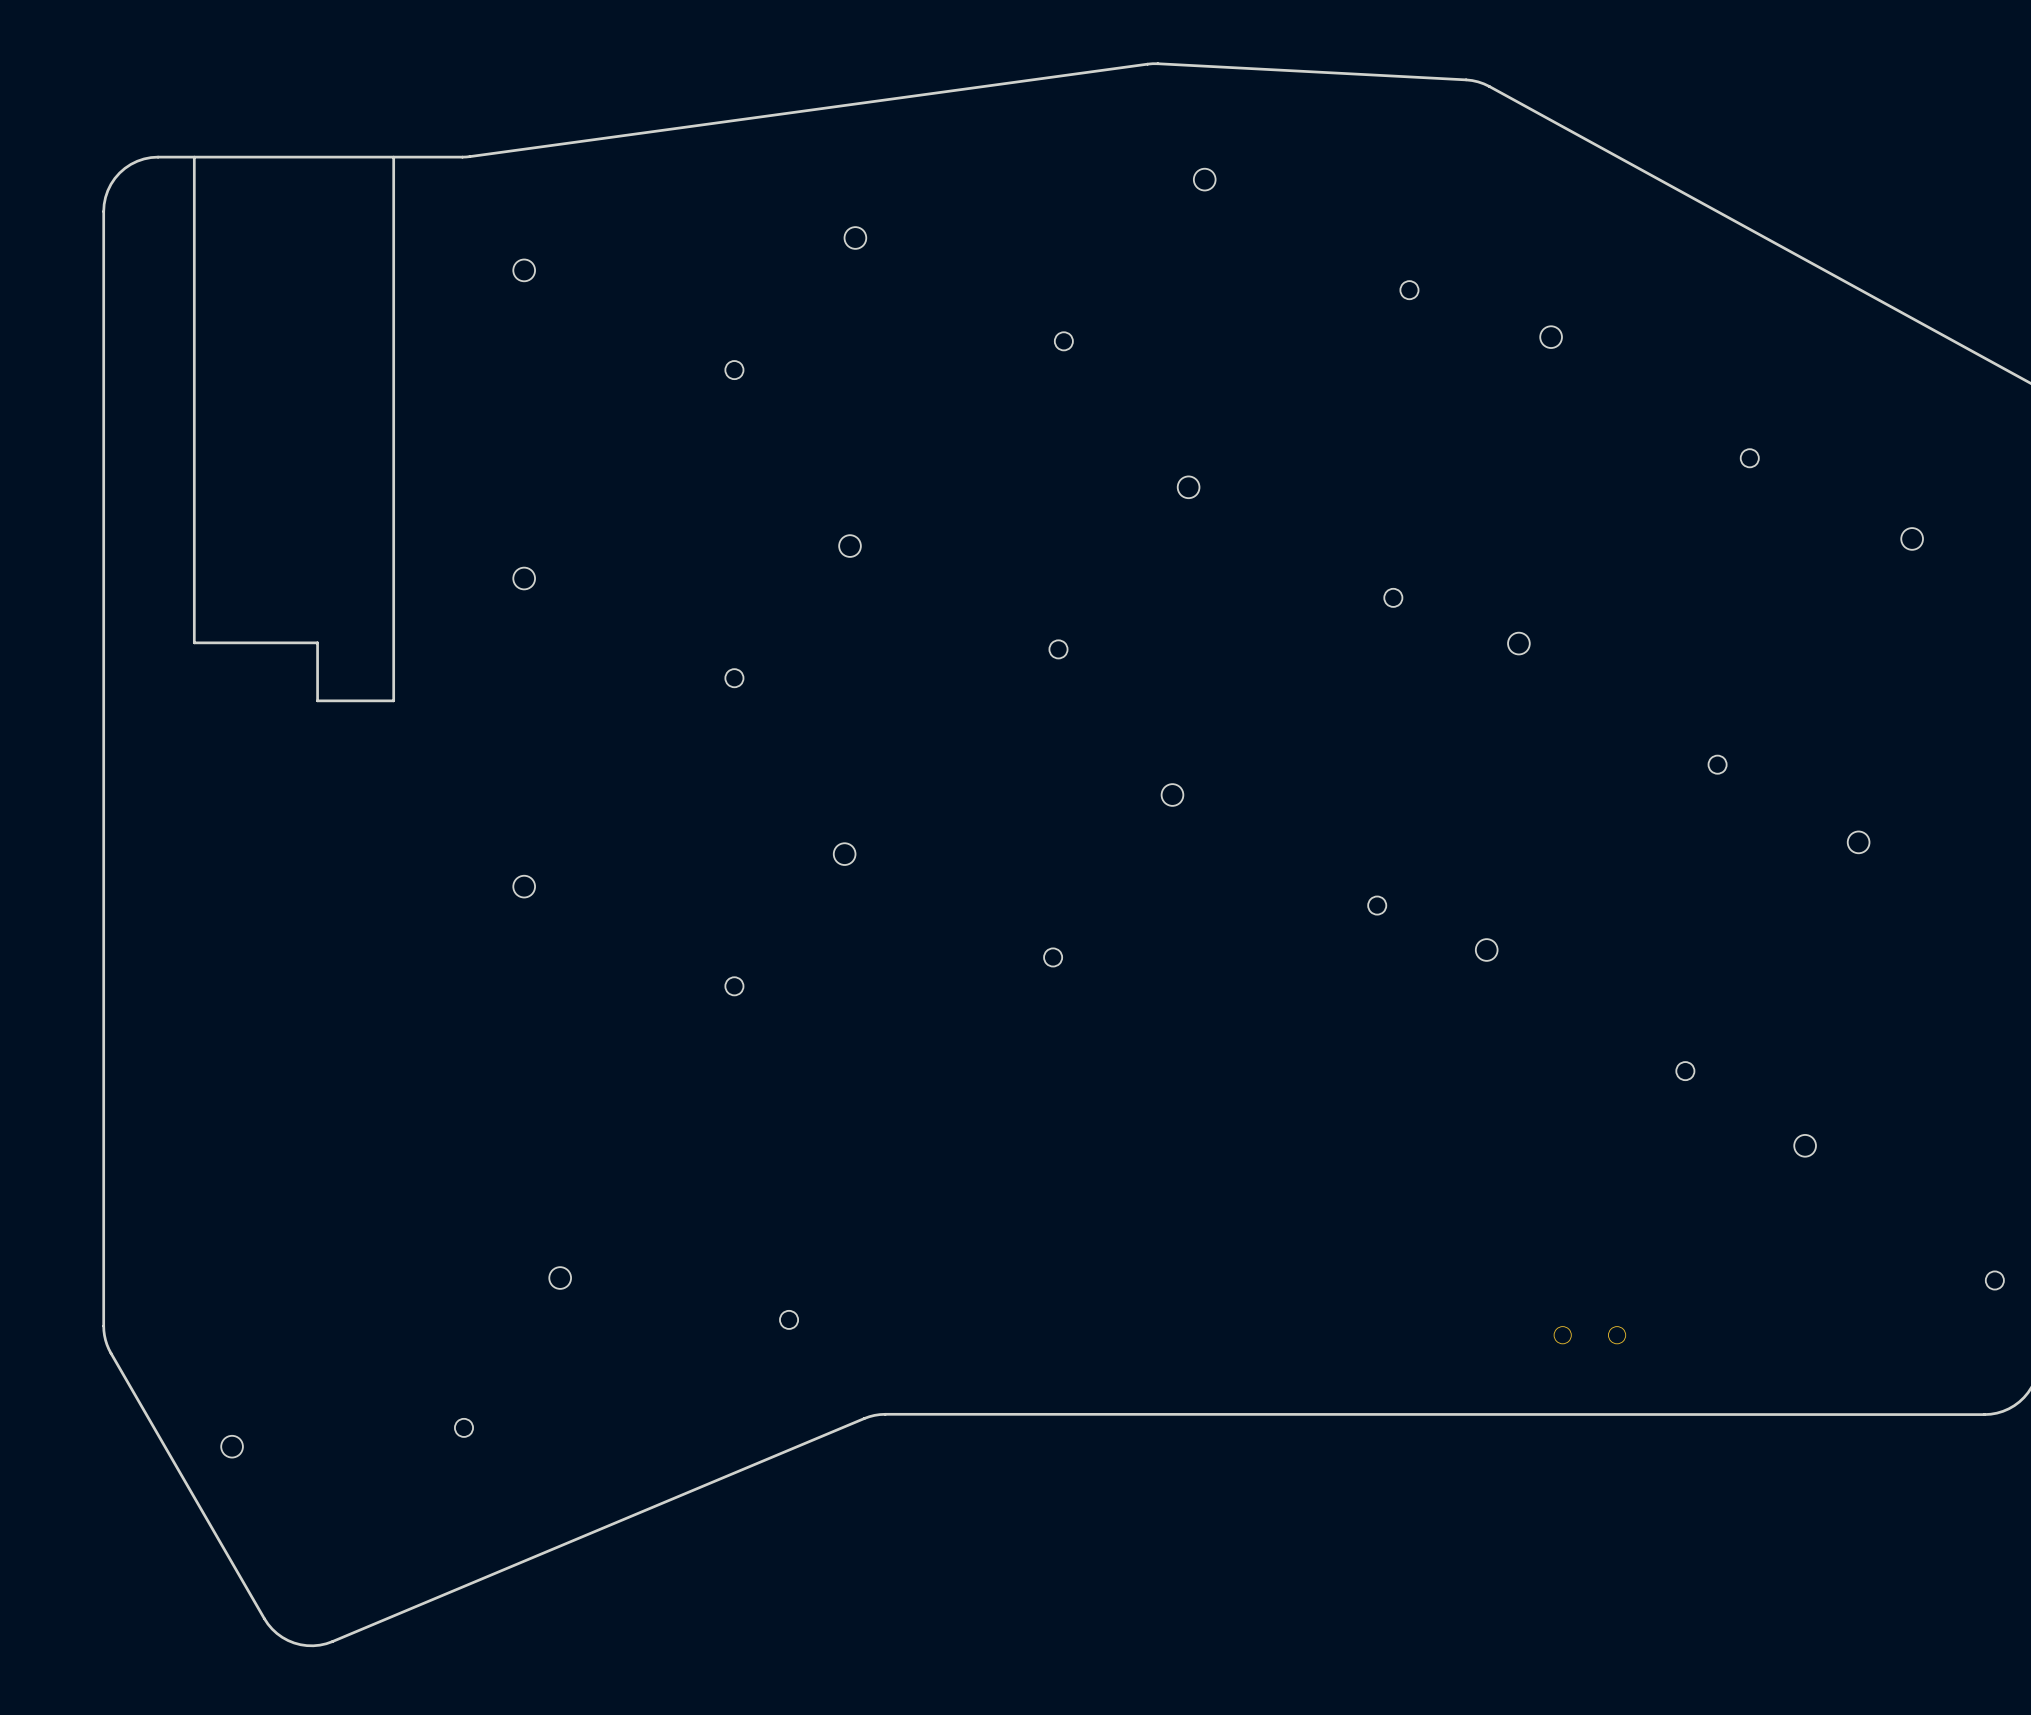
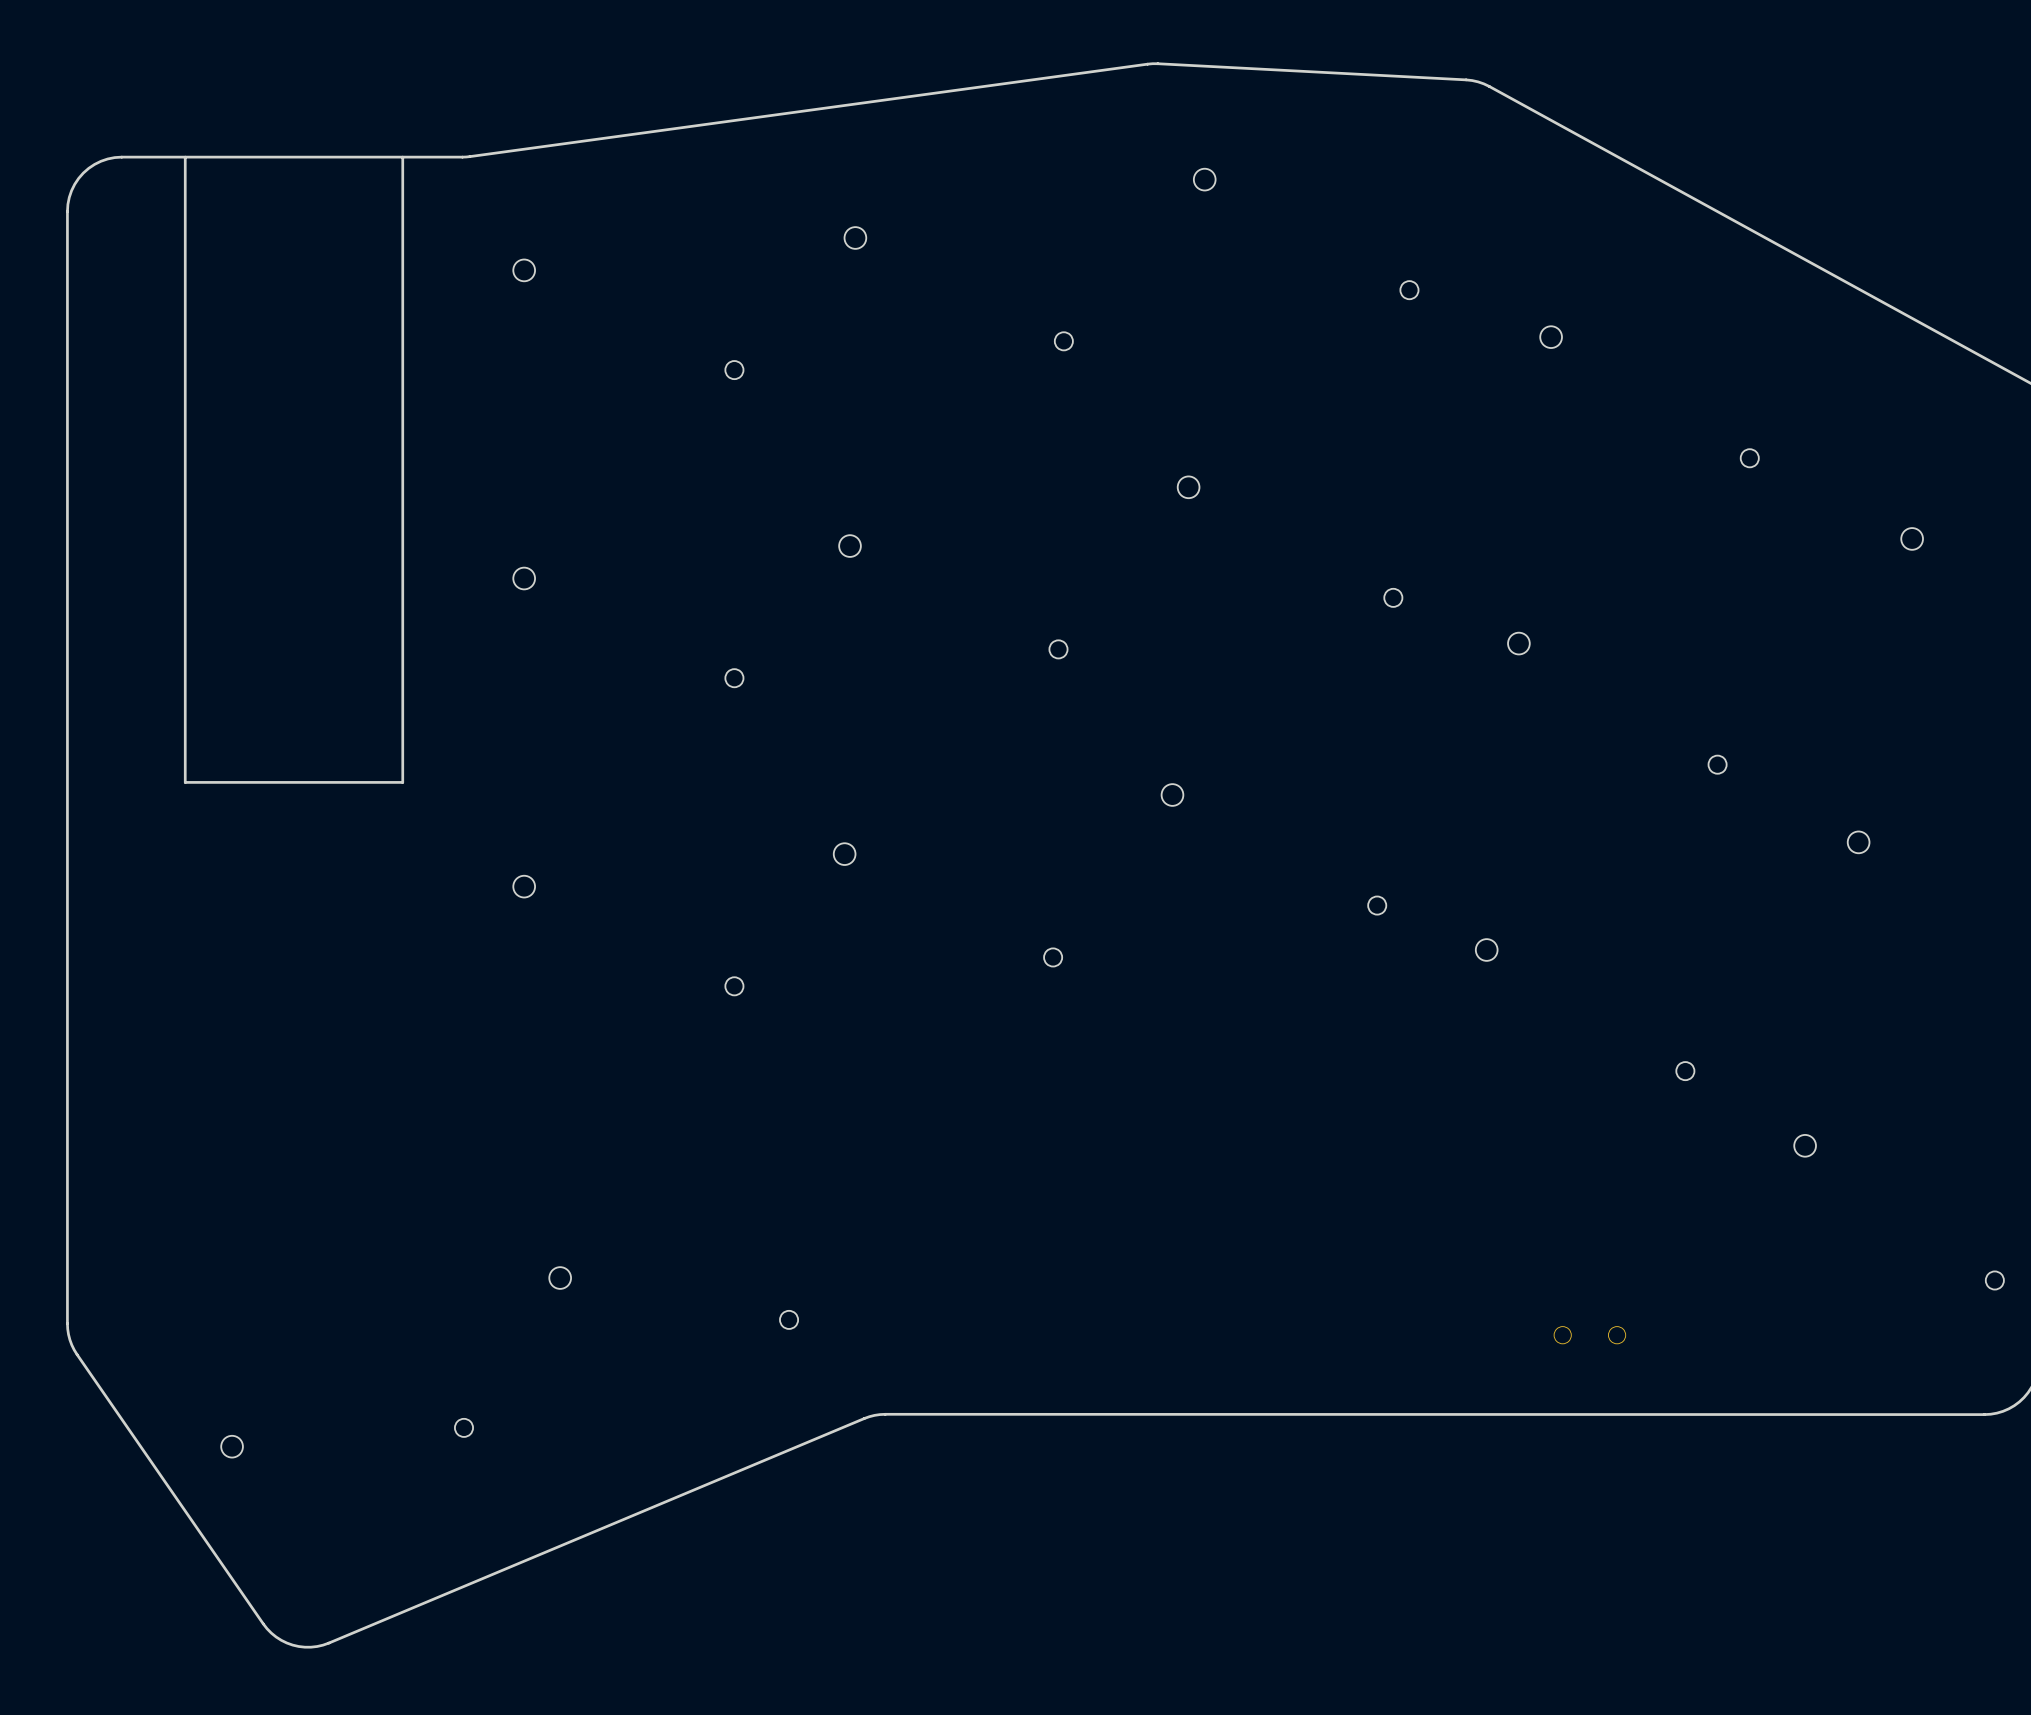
board edge: (158, 157) (137, 161) (119, 173) (107, 190) (103, 211) (103, 1330) (110, 1353) (267, 1624) (282, 1637) (300, 1644) (313, 1645) (332, 1641) -> (158, 157) (114, 157) (94, 164) (78, 178) (71, 190) (67, 204) (67, 1329) (71, 1345) (77, 1354) (267, 1628) (281, 1640) (298, 1646) (317, 1646) (332, 1641)
board edge: (393, 157) (393, 700) (317, 700) (317, 642) (194, 642) (194, 157) -> none
board edge: none -> (402, 157) (402, 782) (185, 782) (185, 157)

